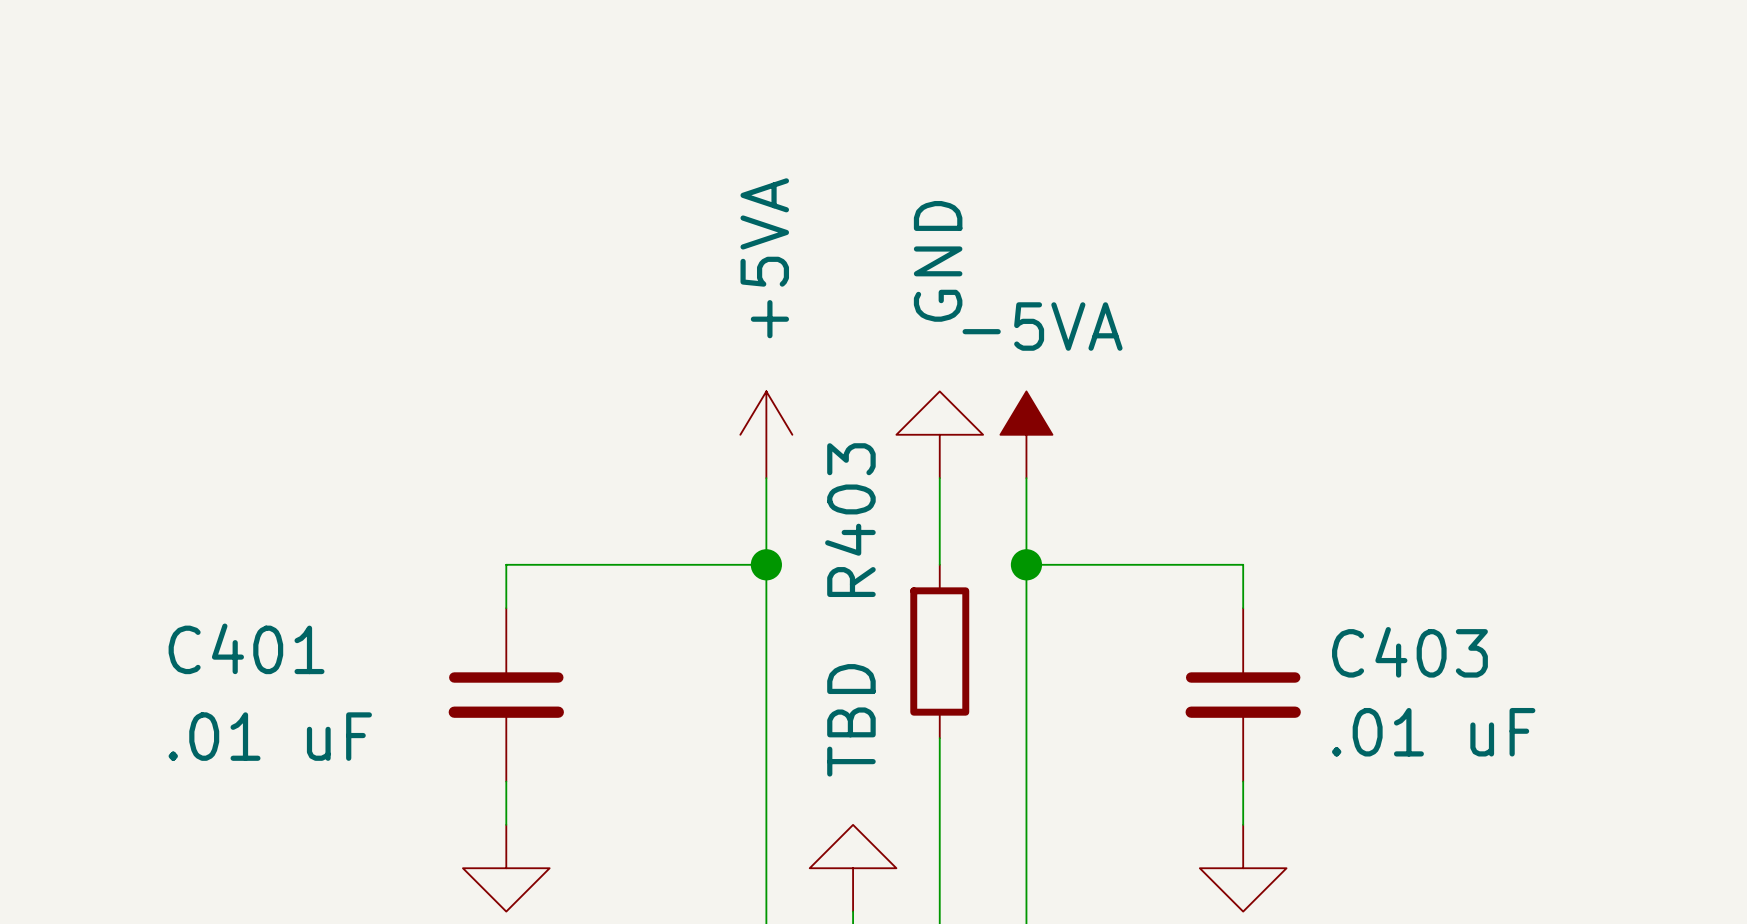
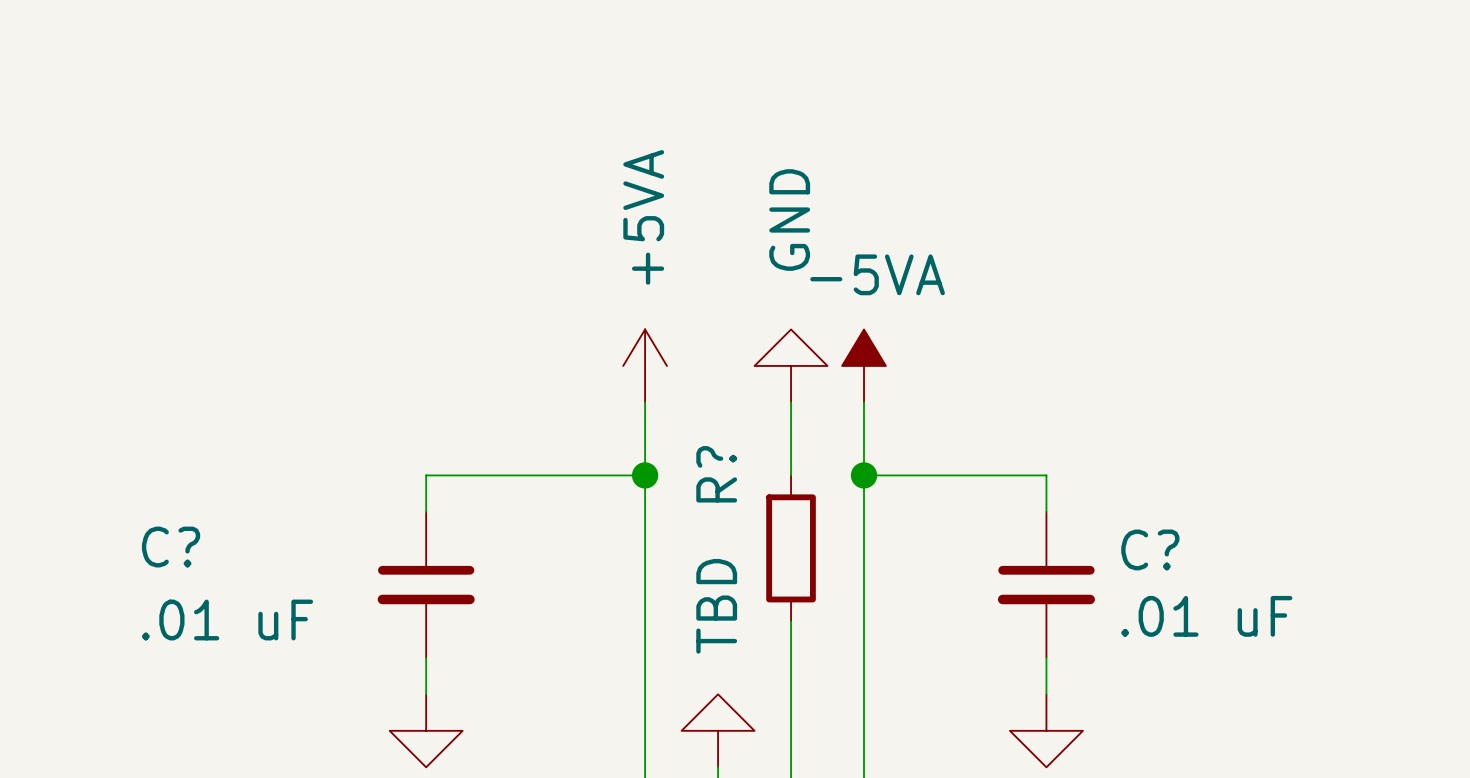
R403 name: R403 (850, 520) -> R? (716, 474)
C401 name: C401 (246, 648) -> C? (171, 547)
C403 name: C403 (1409, 652) -> C? (1150, 549)

